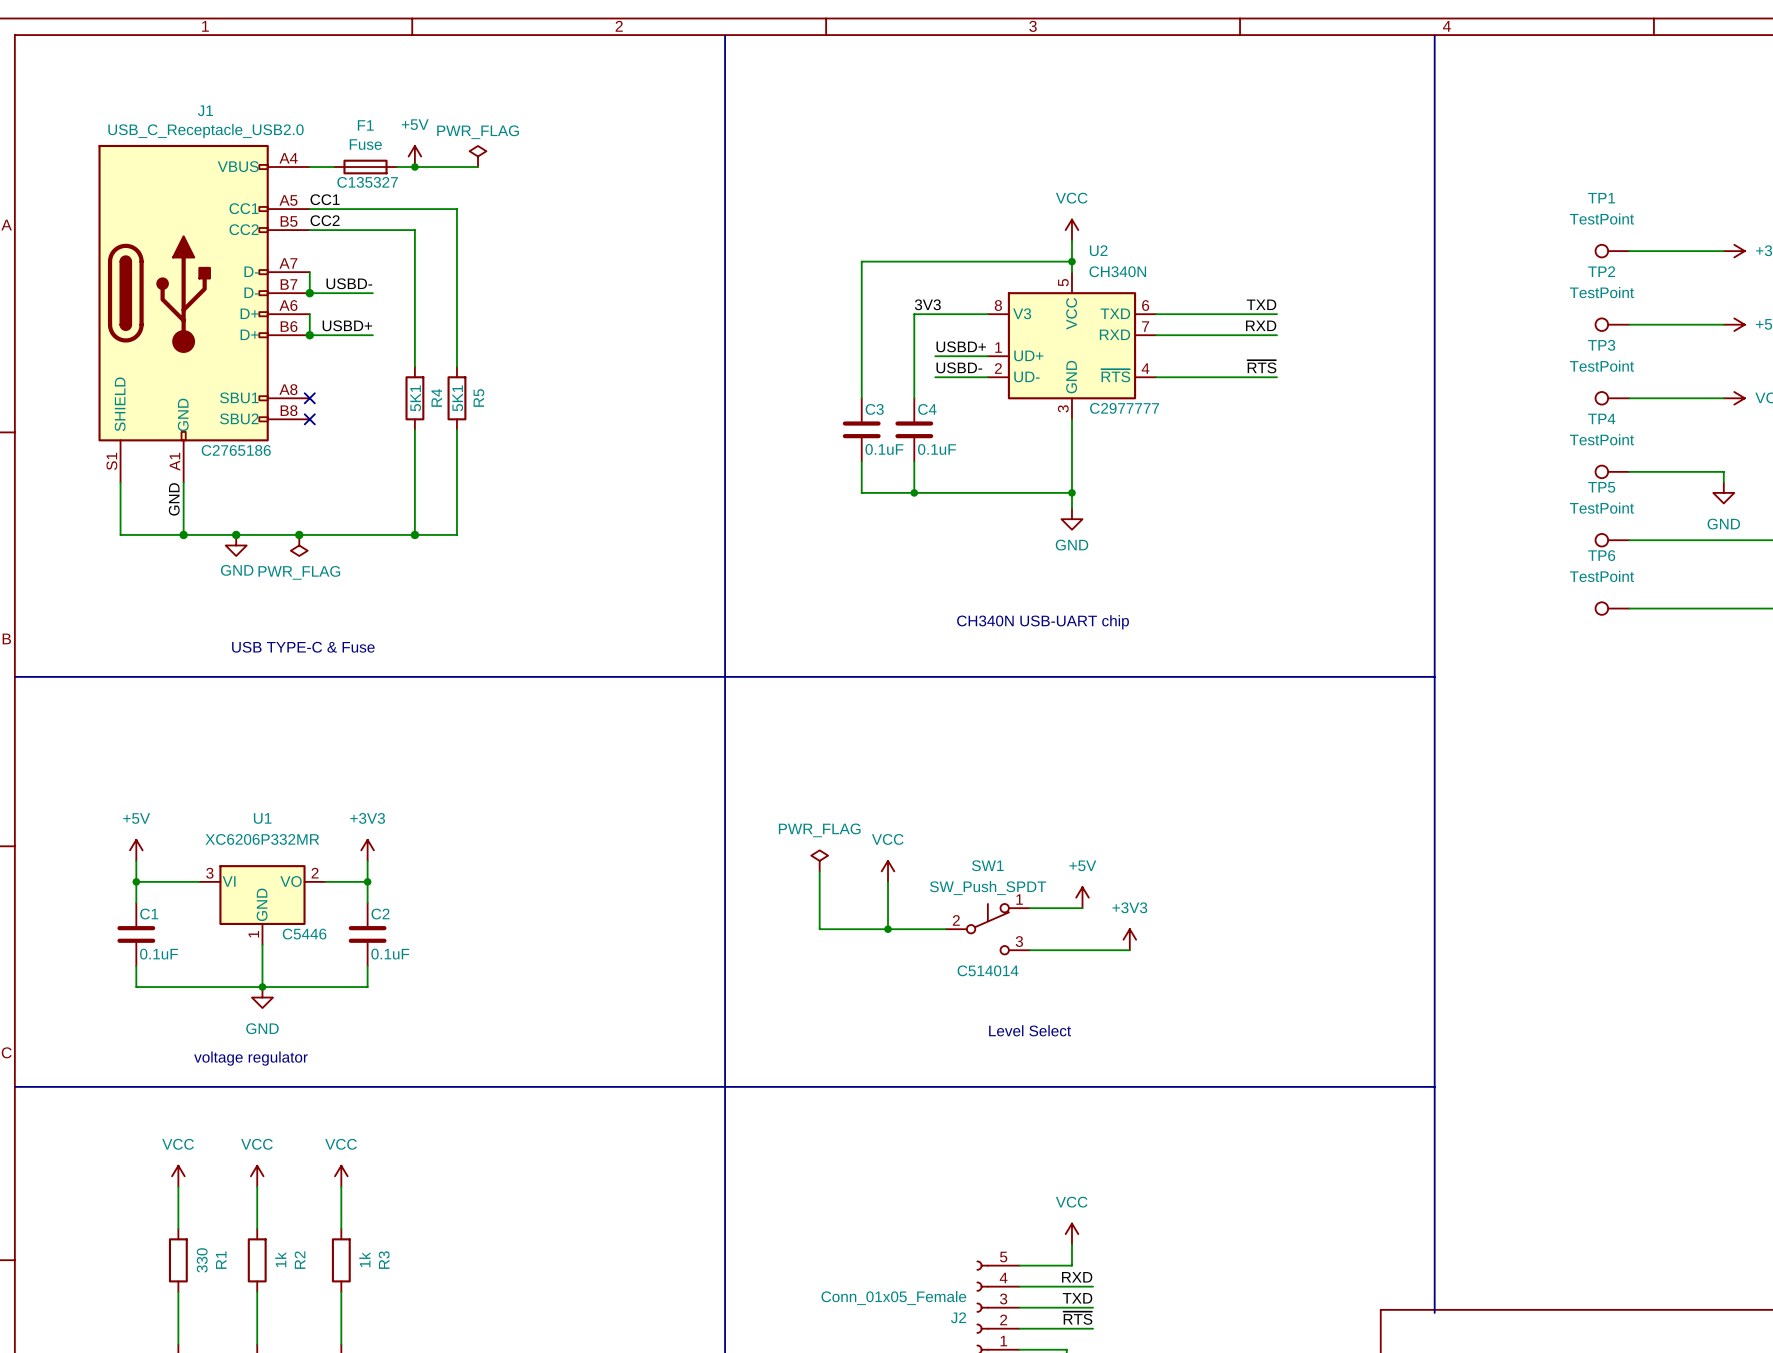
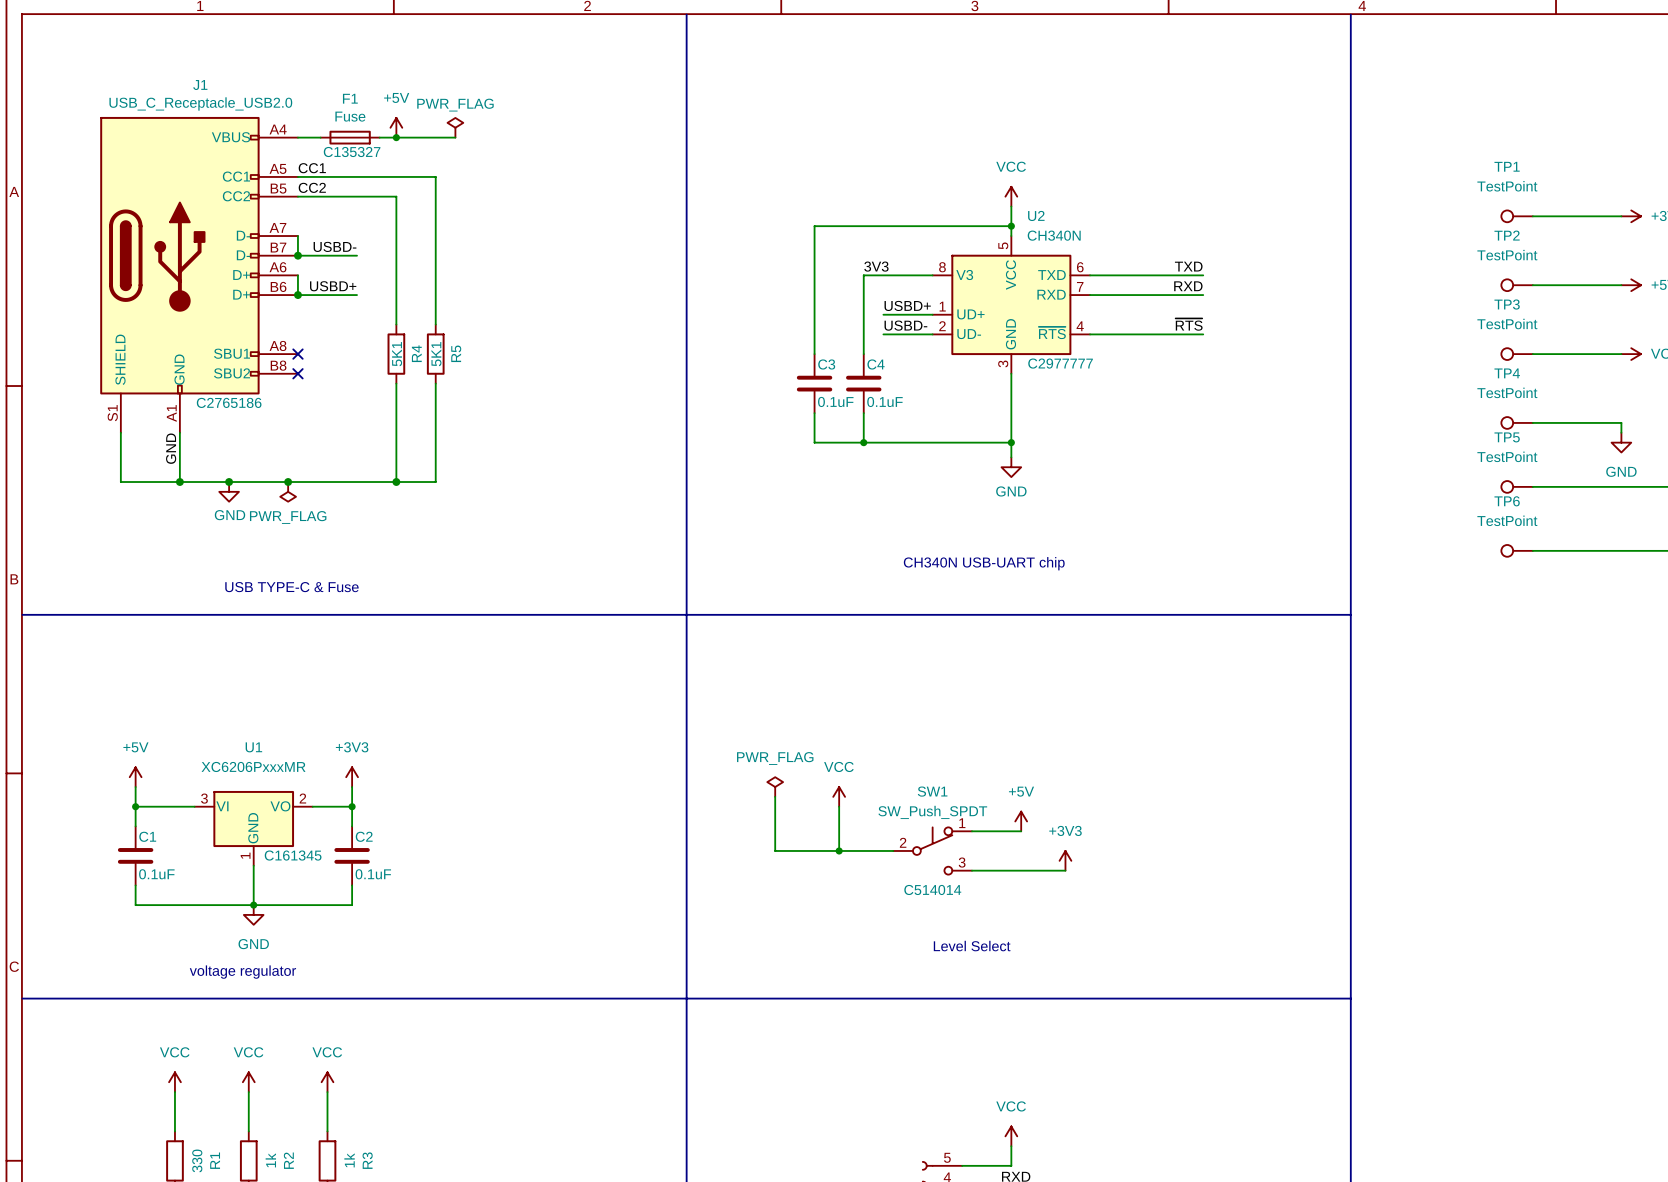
U1 value: XC6206P332MR (262, 839) -> XC6206PxxxMR (253, 766)
U1 text: C5446 (304, 934) -> C161345 (293, 855)

